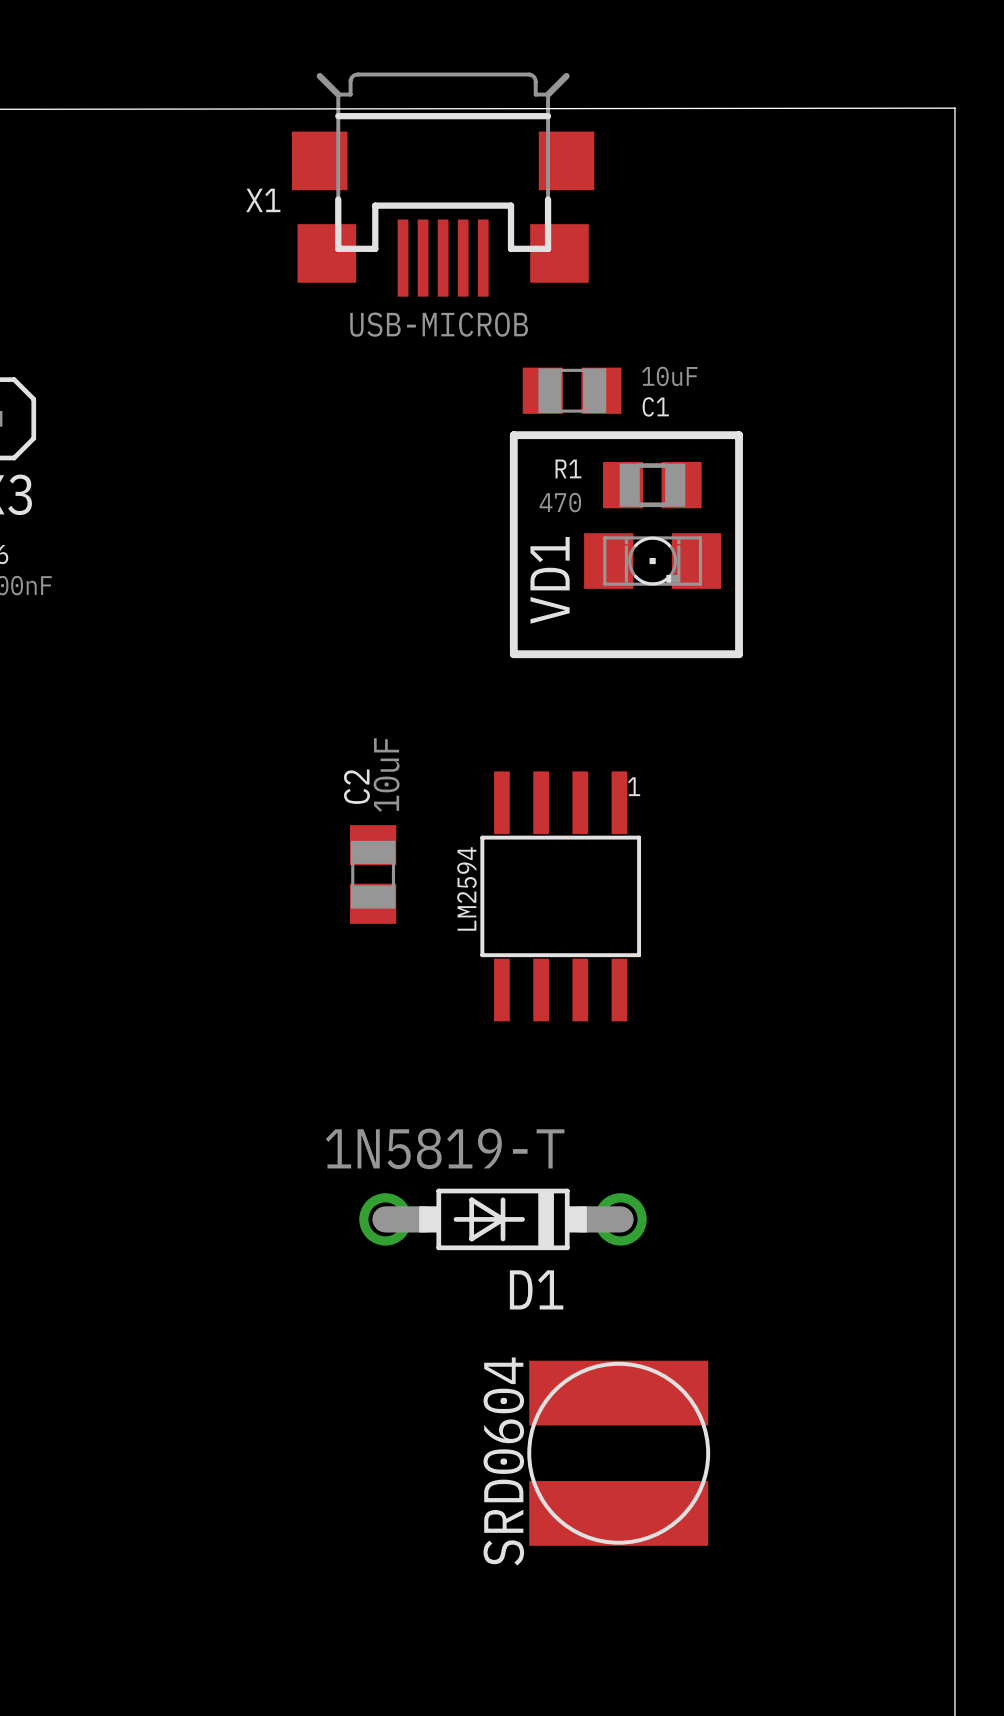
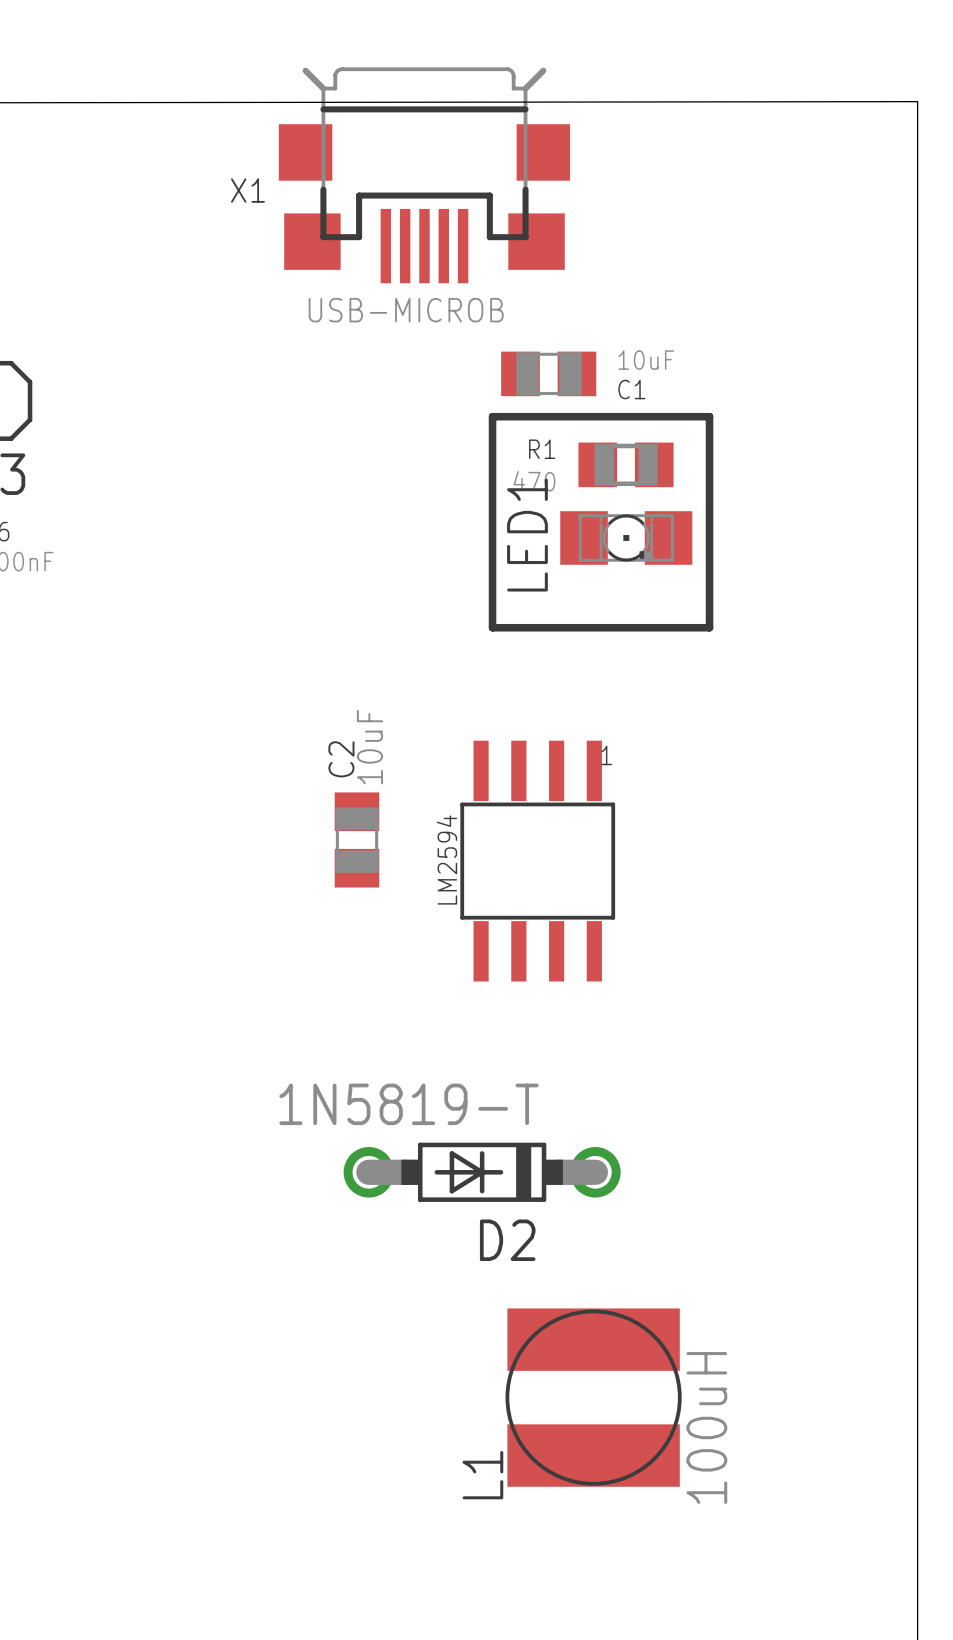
VD1 name: VD1 (550, 580) -> LED1 (527, 535)
D1 name: D1 (536, 1289) -> D2 (507, 1240)
L1 text: SRD0604 (503, 1461) -> none
L1 value: none -> 100uH (706, 1427)
L1 name: none -> L1 (482, 1475)

